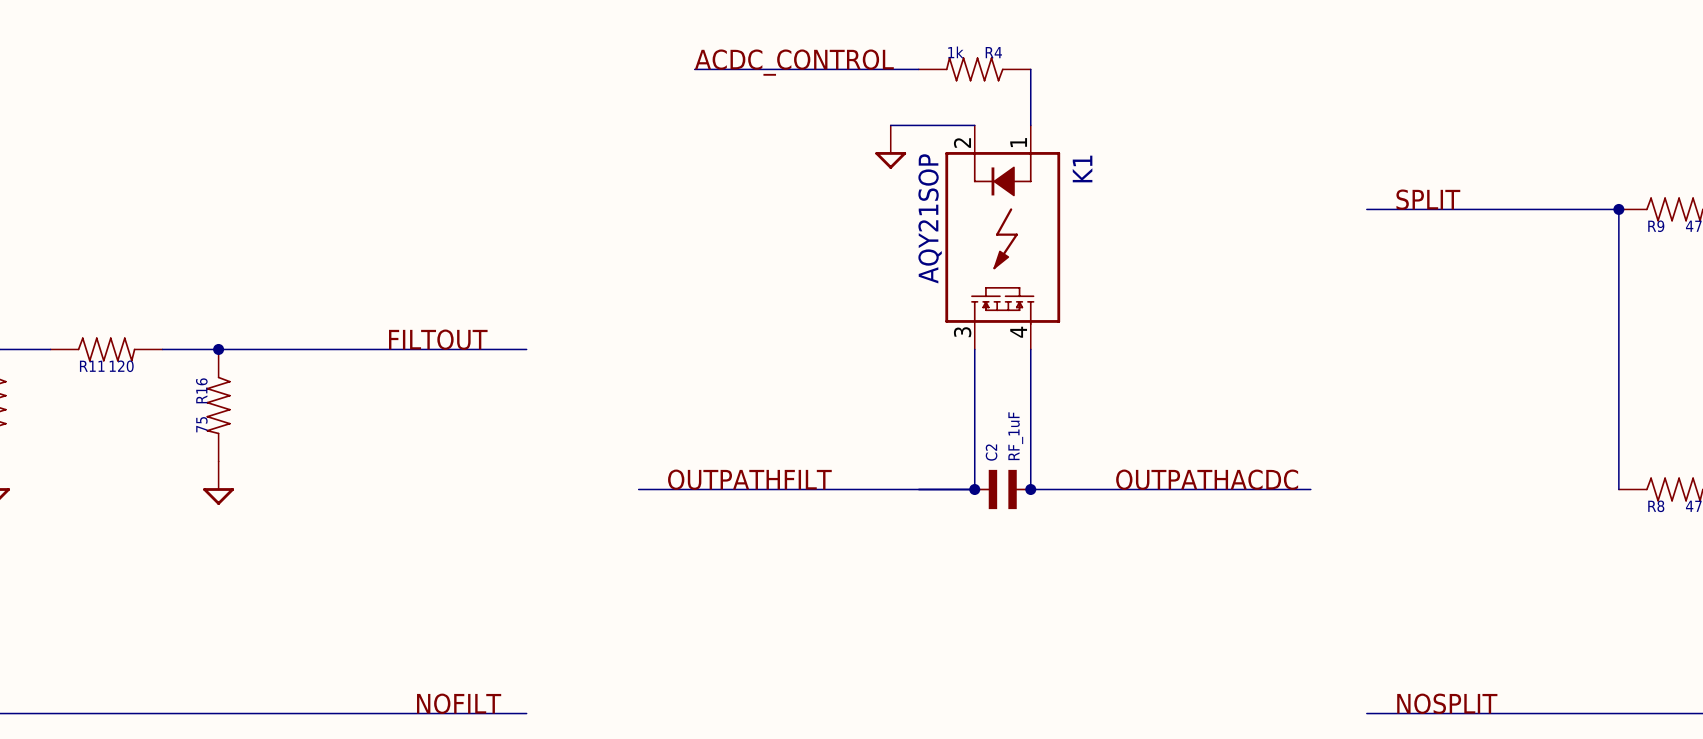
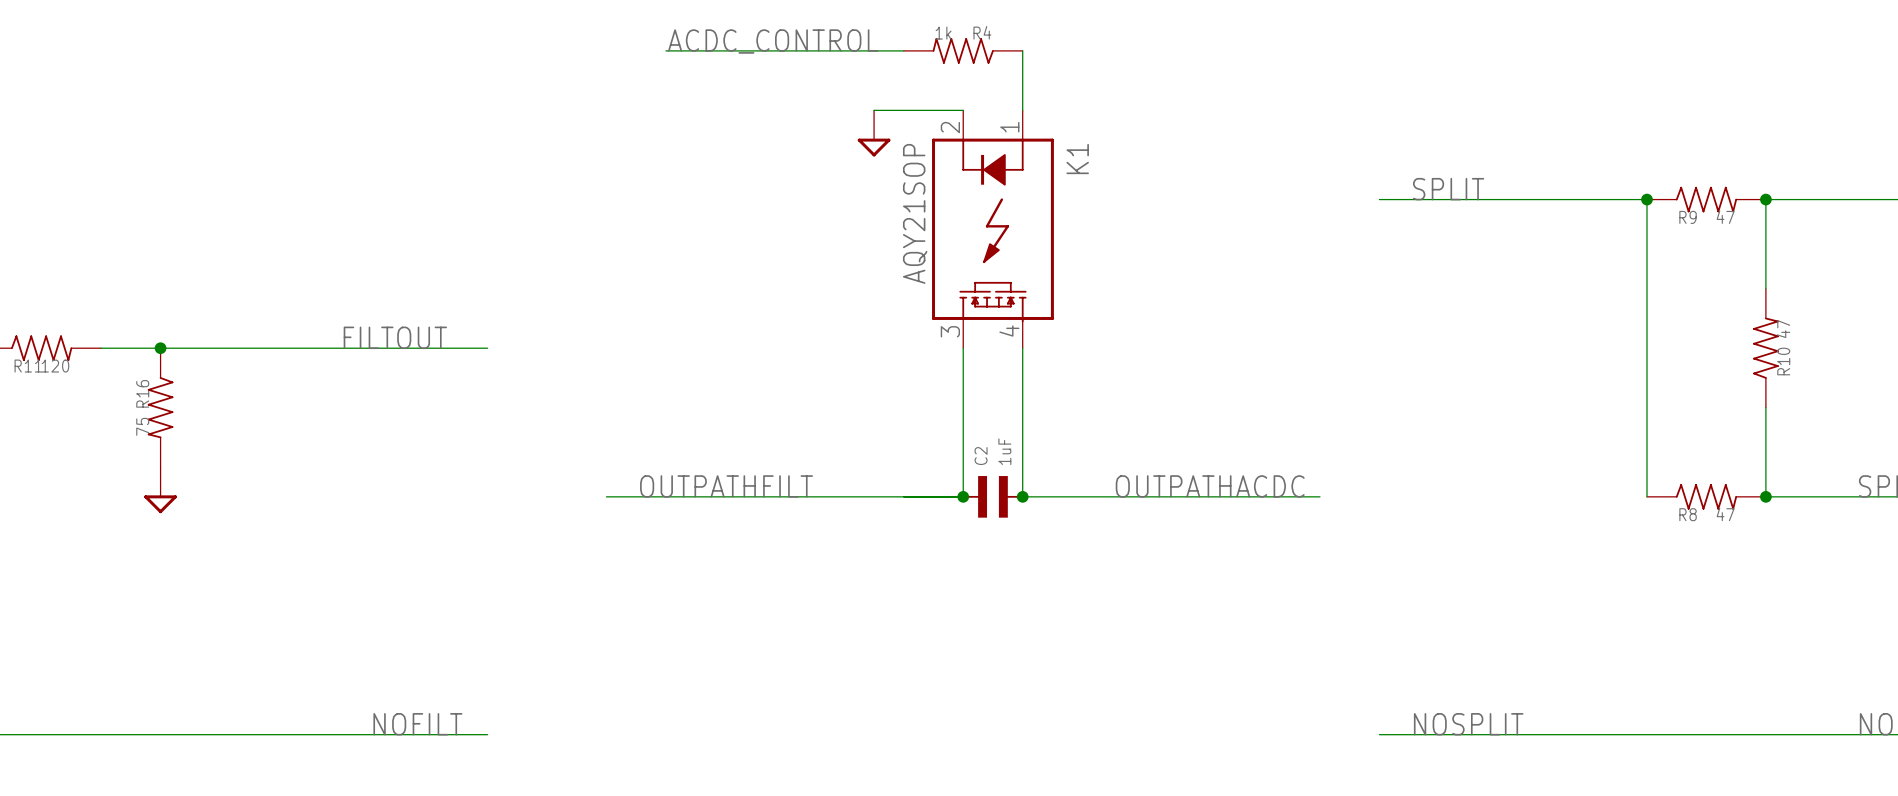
C2 value: RF_1uF (1015, 436) -> 1uF (1004, 451)

